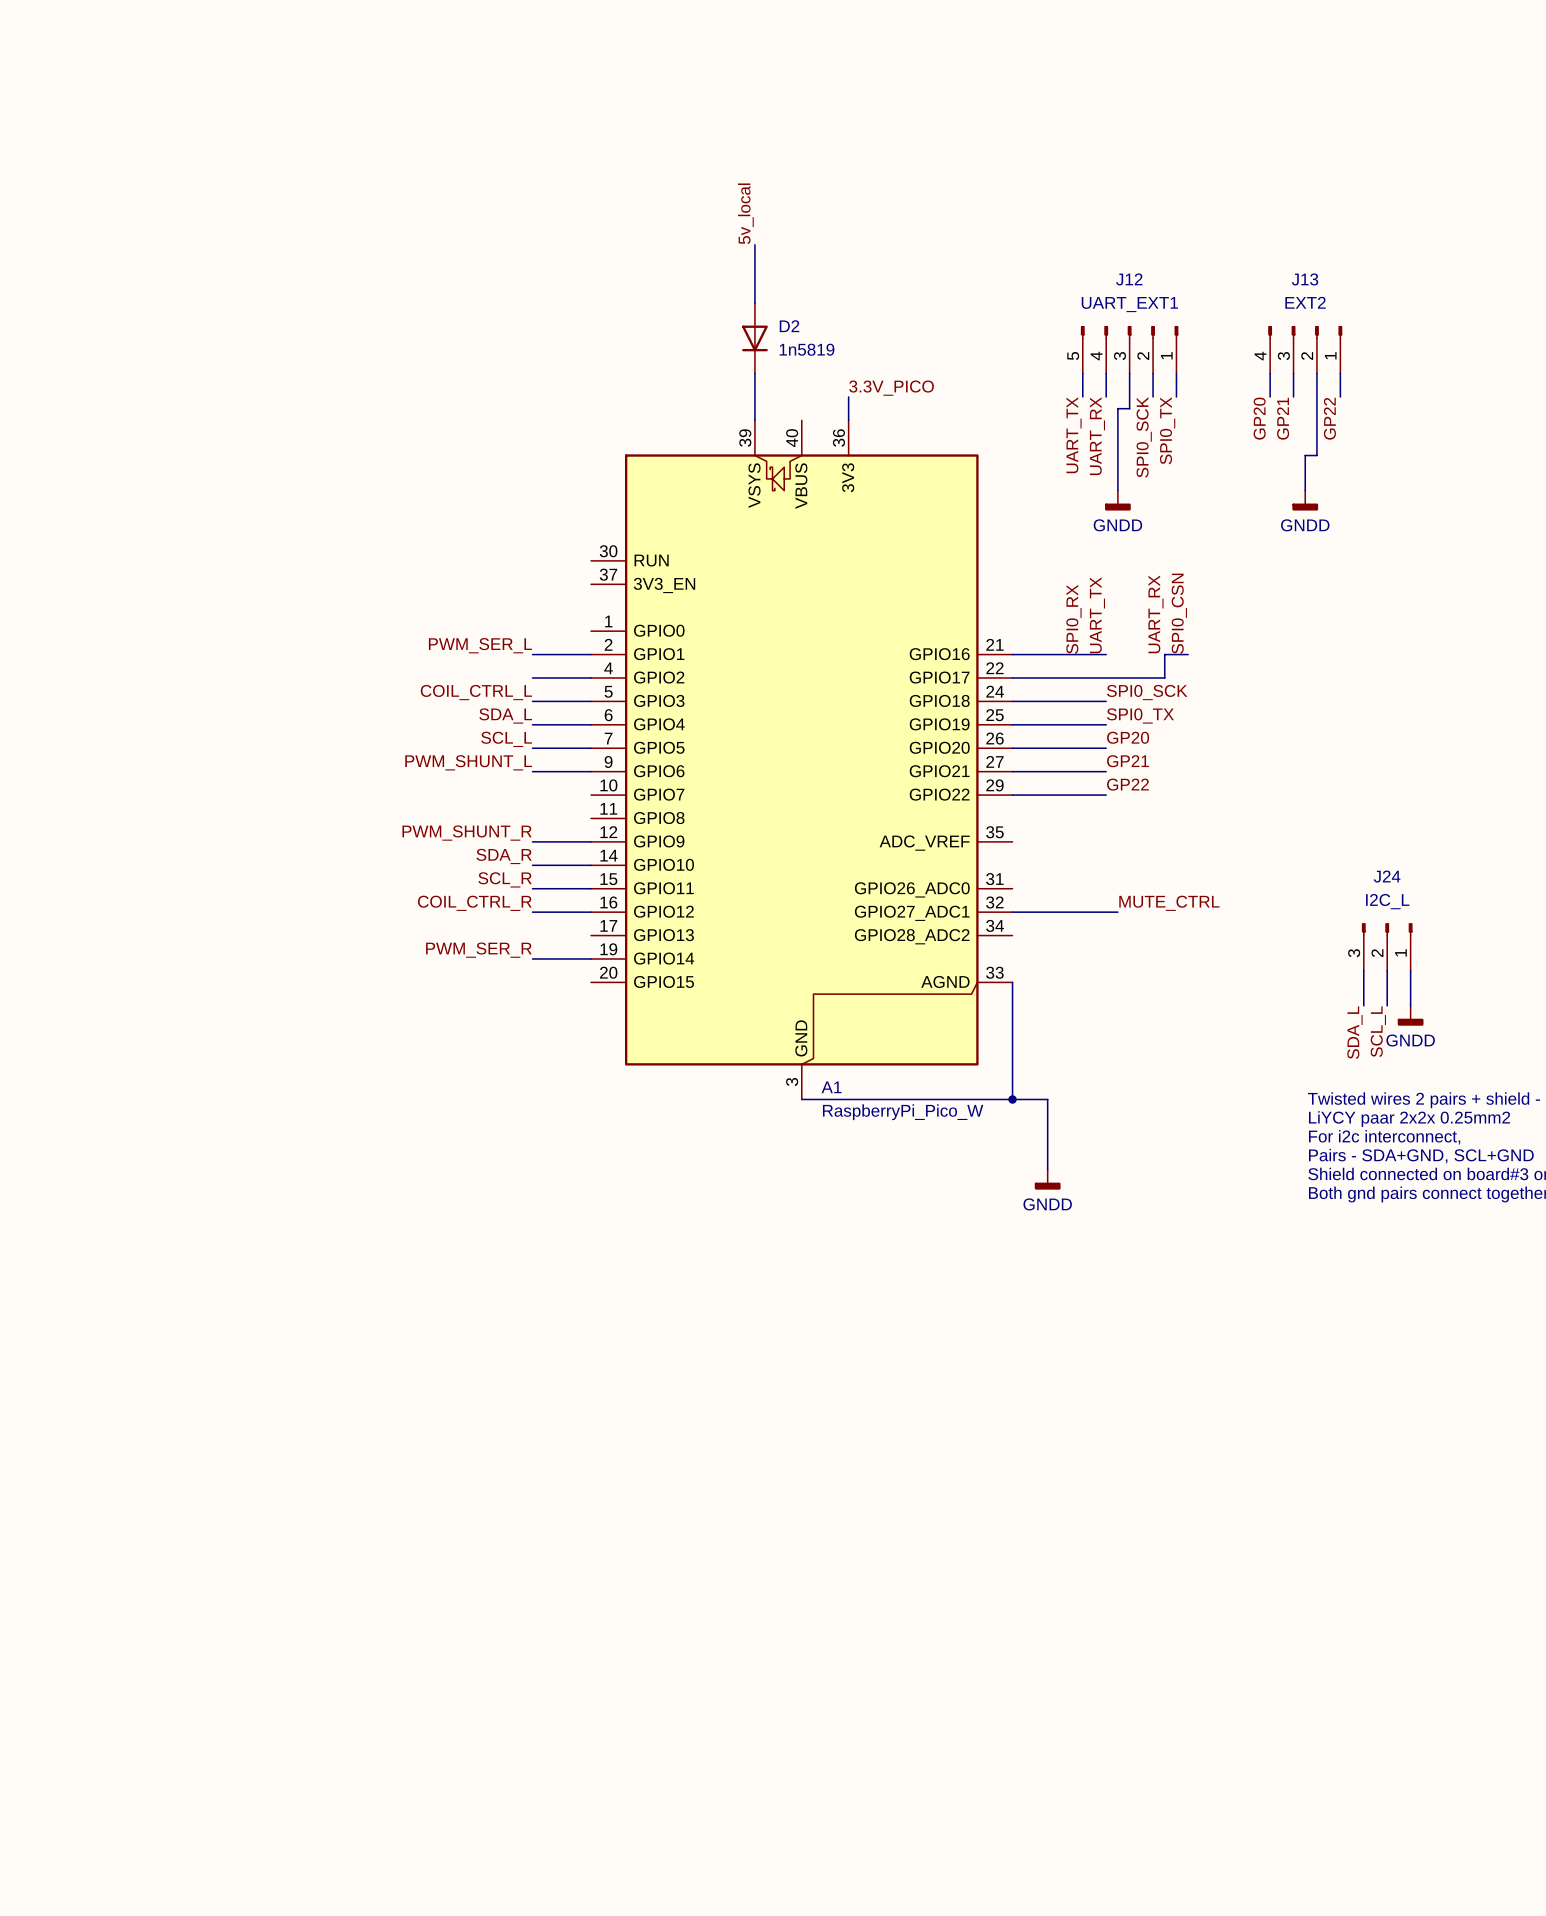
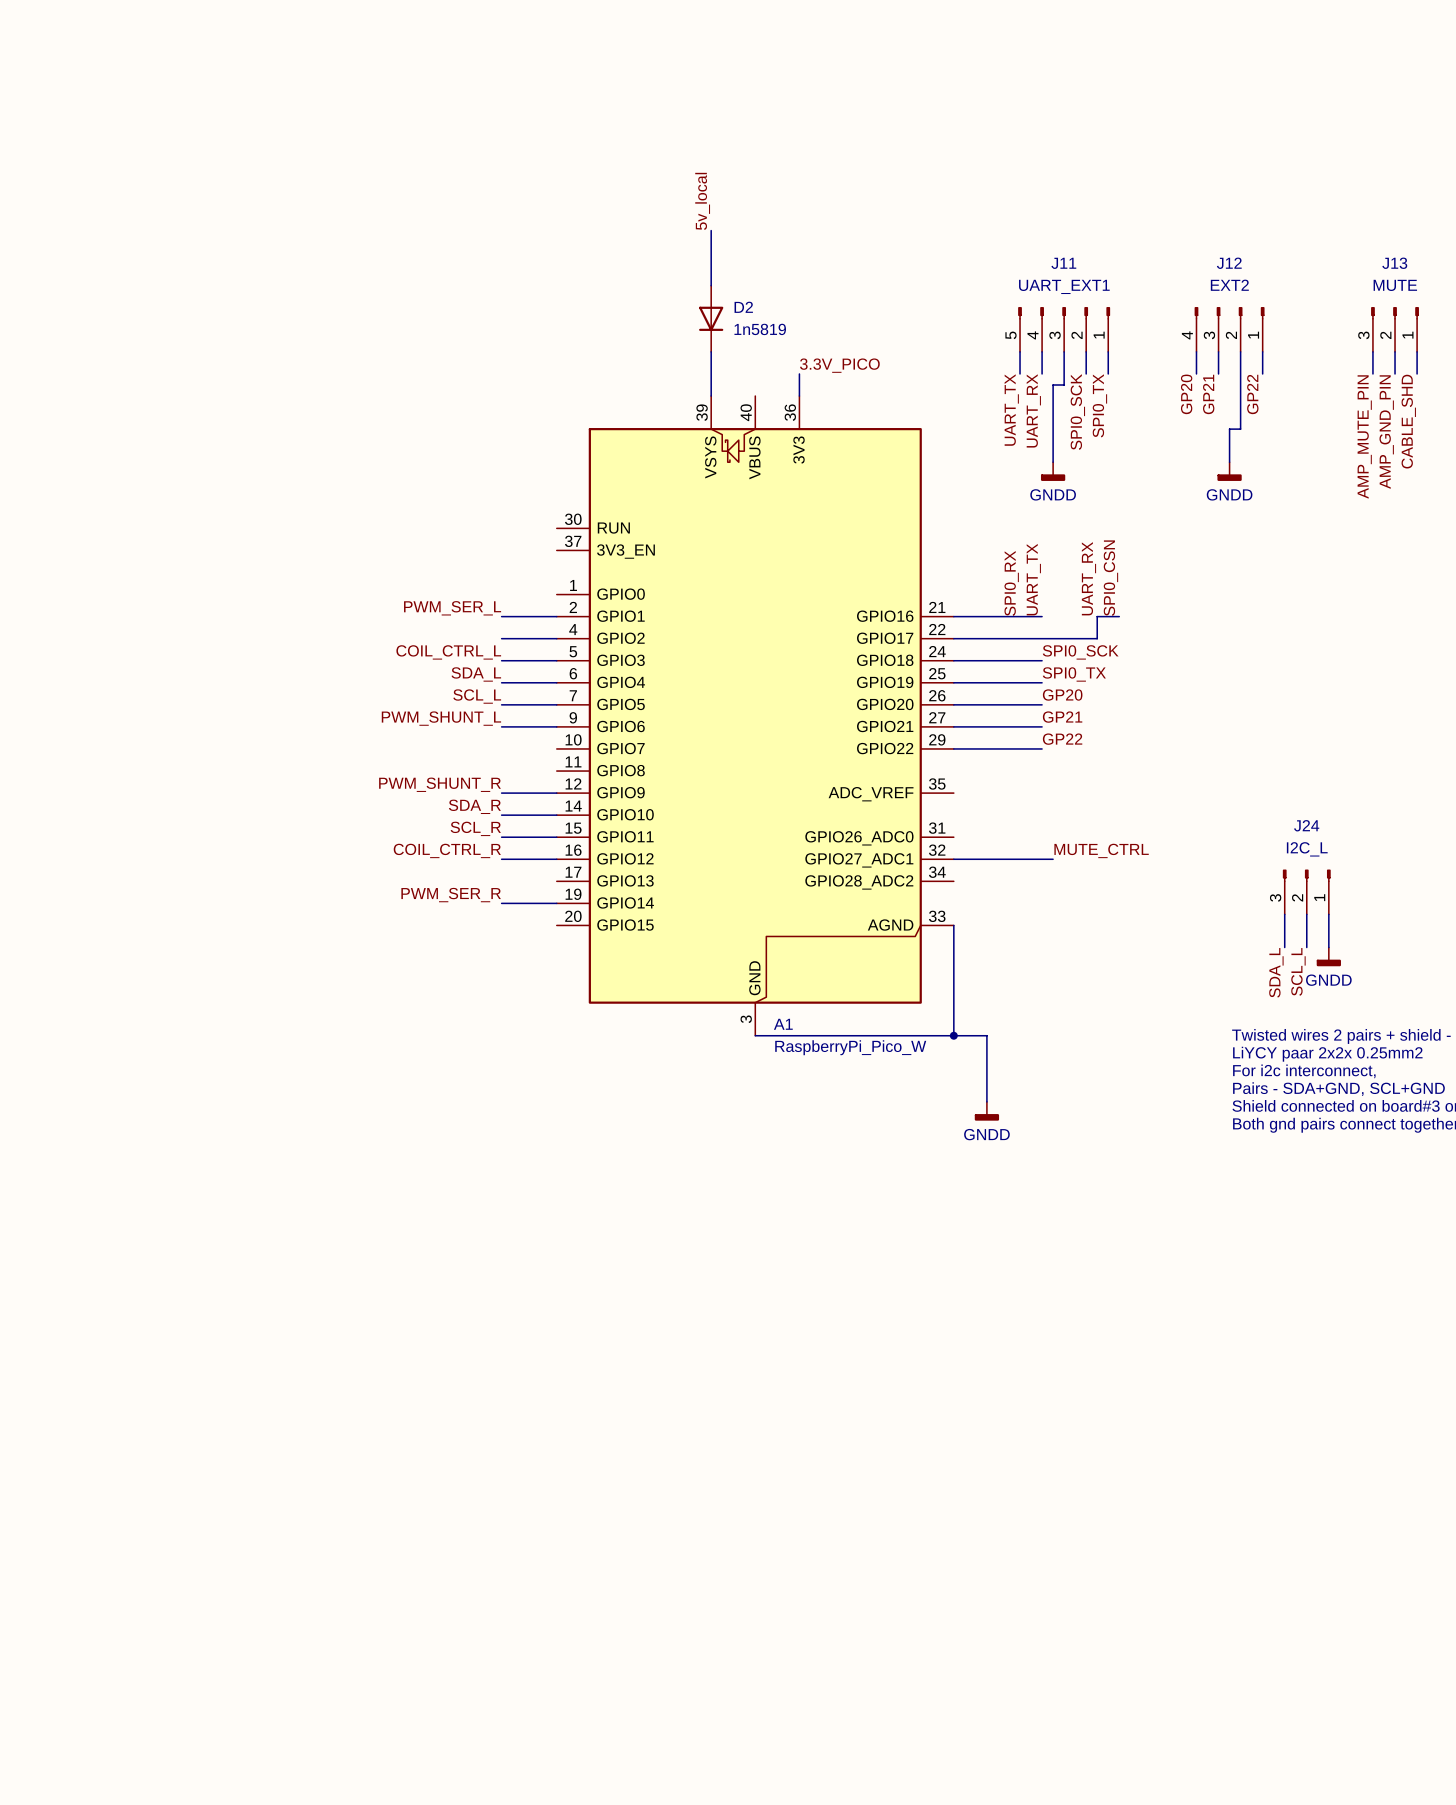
J12 name: J12 (1129, 279) -> J11 (1063, 263)
J13 name: J13 (1305, 279) -> J12 (1229, 263)
J13: none -> MUTE (1395, 329)
wire: none -> (1372, 351) (1372, 373)
wire: none -> (1395, 351) (1395, 373)
wire: none -> (1417, 351) (1417, 373)
label: none -> CABLE_SHD (1408, 421)
label: none -> AMP_GND_PIN (1386, 432)
label: none -> AMP_MUTE_PIN (1364, 436)

